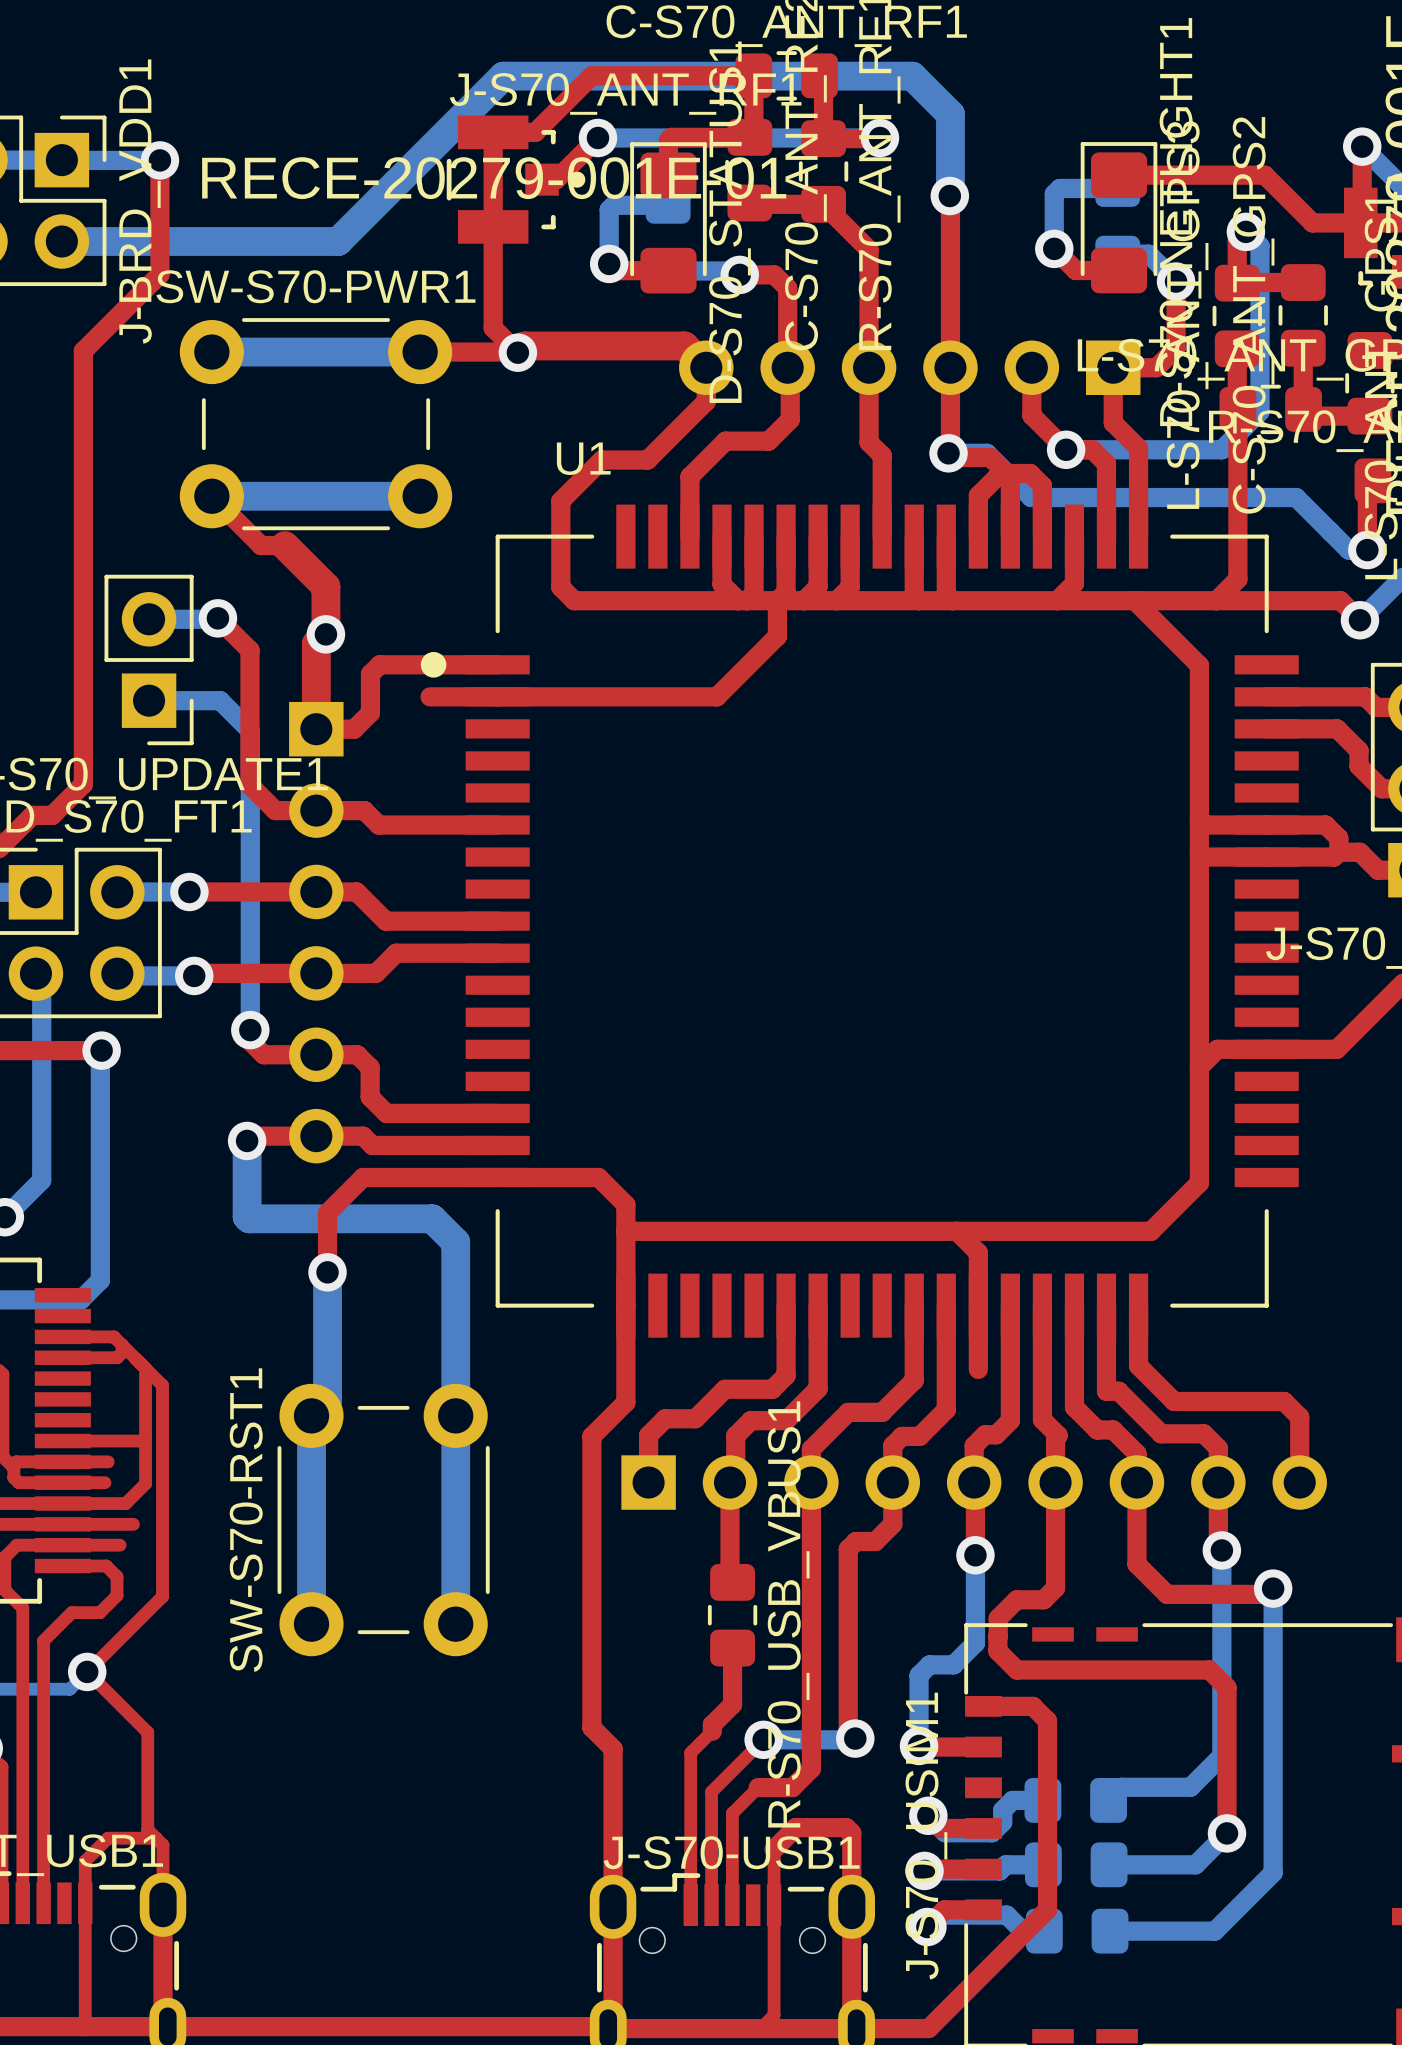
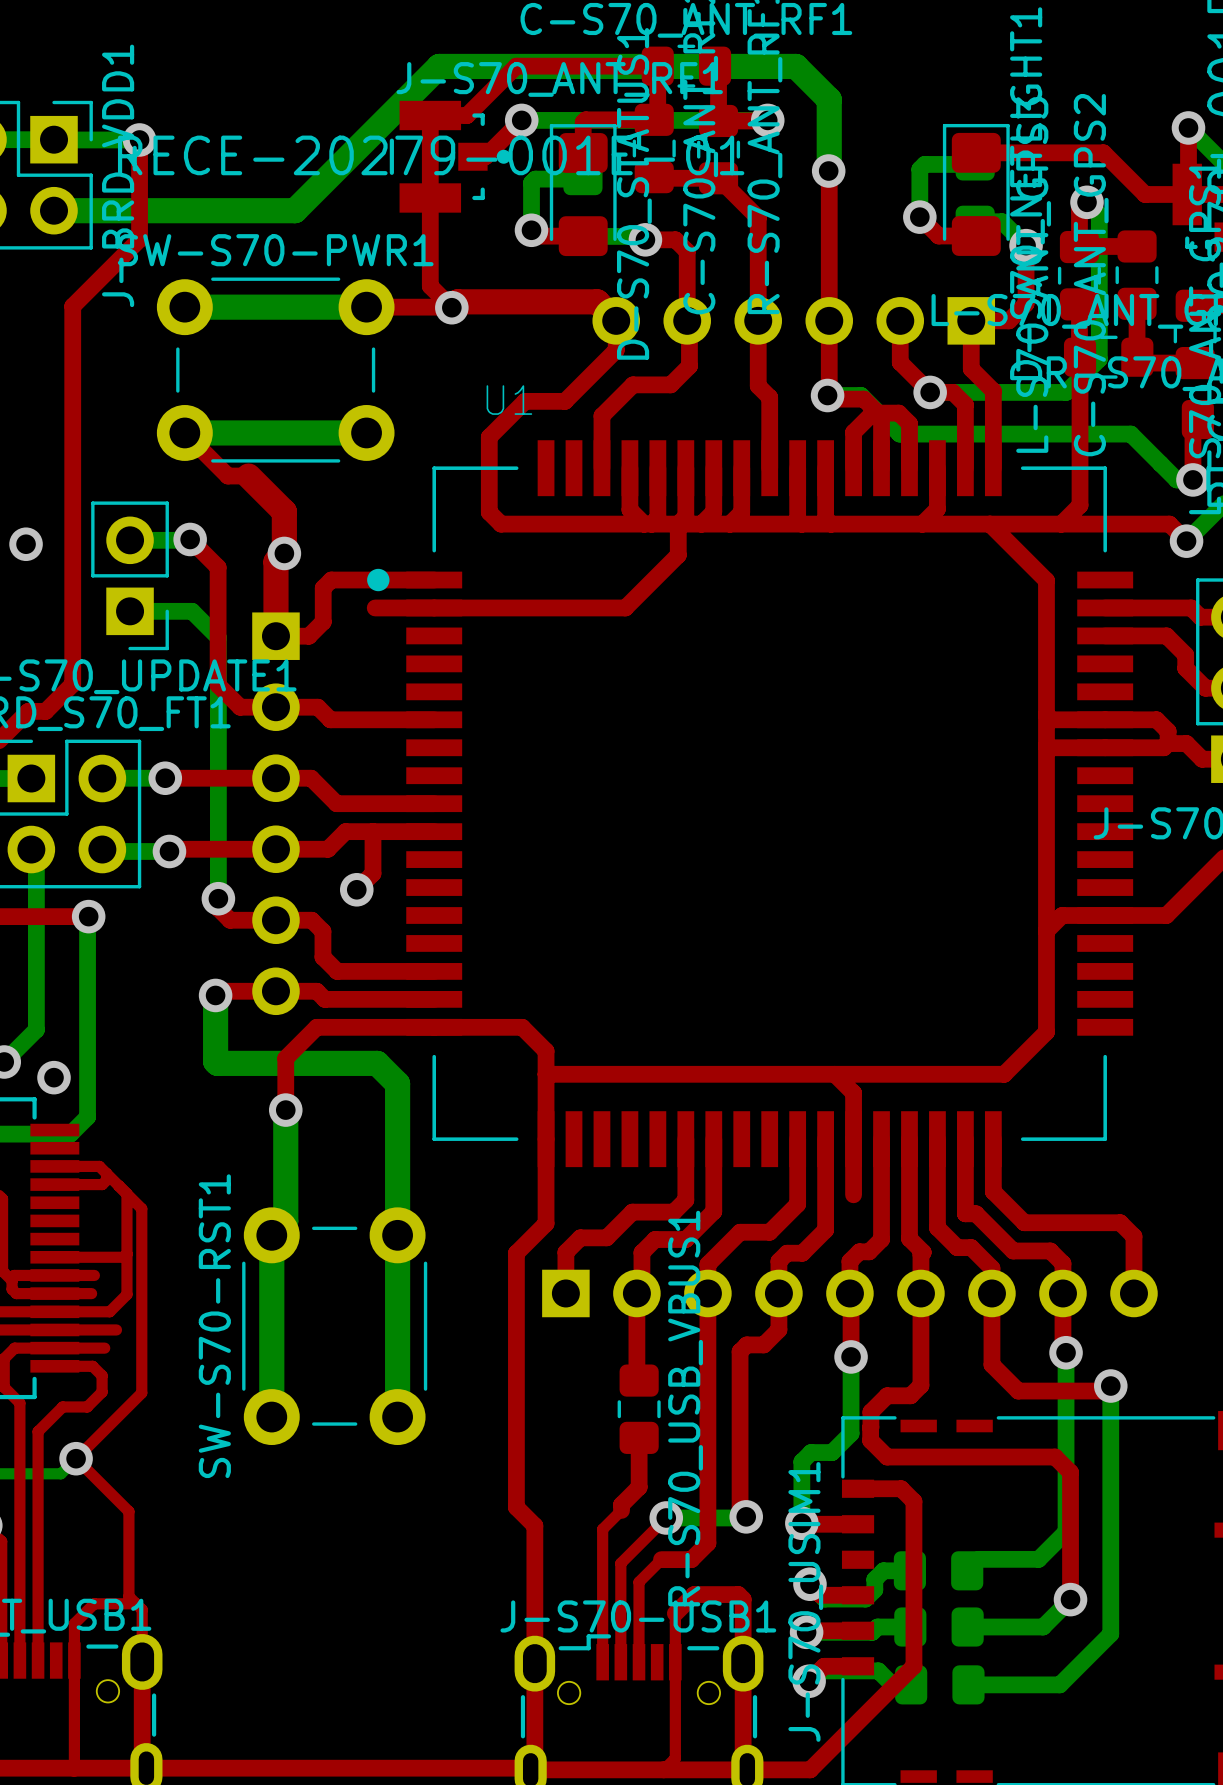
via: none -> (26, 544)
top track: none -> (372, 831) (372, 873) (356, 889)
via: none -> (356, 889)
via: none -> (54, 1077)

